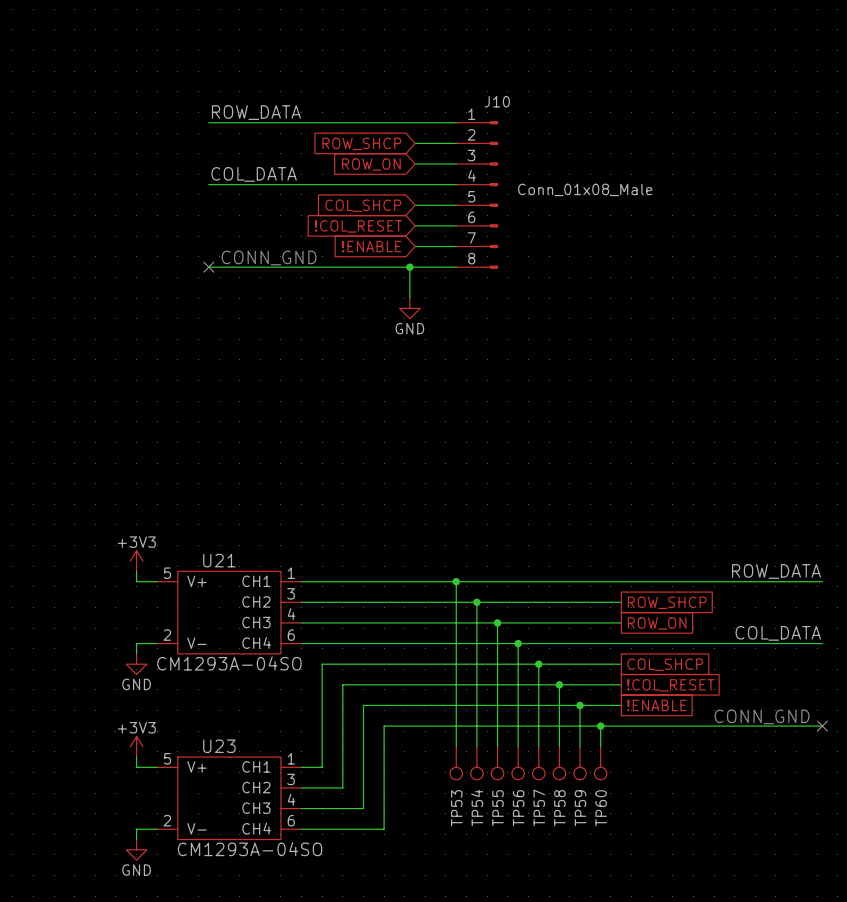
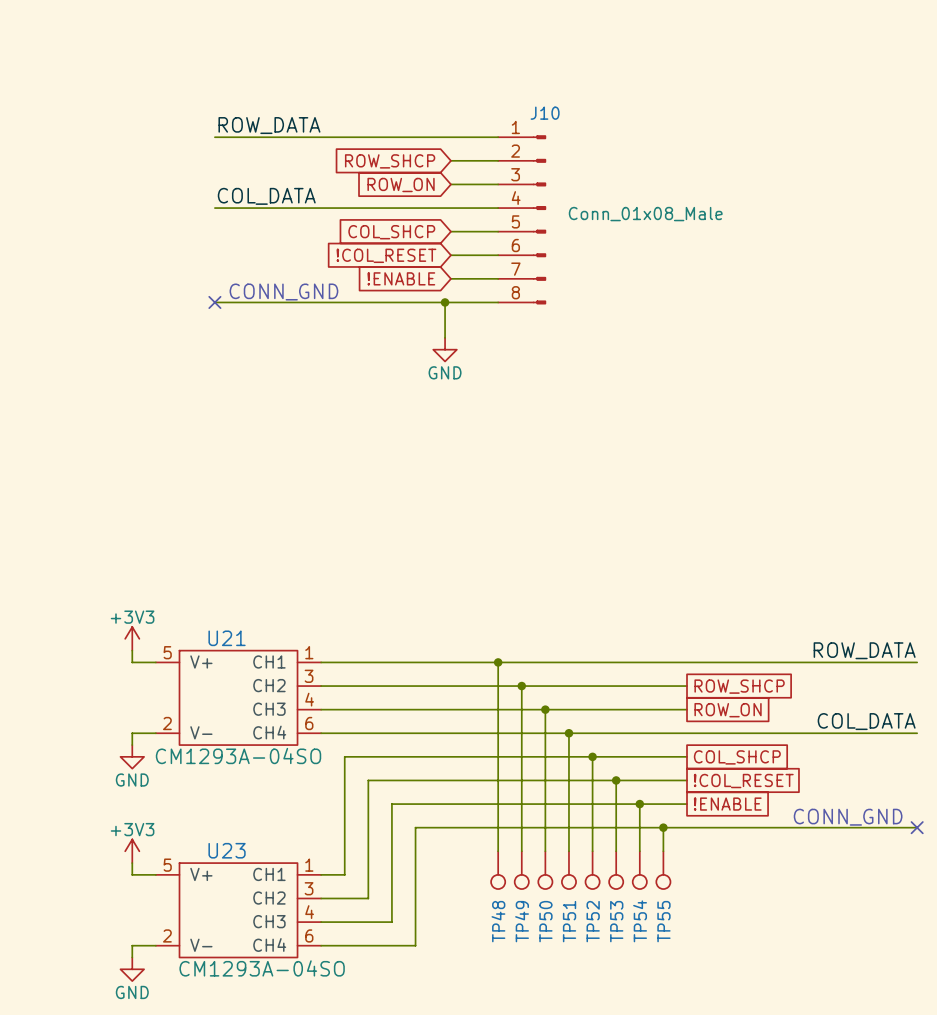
TP54 name: TP54 (477, 807) -> TP49 (522, 921)
TP57 name: TP57 (539, 807) -> TP52 (593, 921)
TP53 name: TP53 (456, 808) -> TP48 (498, 921)
TP55 name: TP55 (498, 808) -> TP50 (545, 921)
TP56 name: TP56 (518, 808) -> TP51 (569, 921)
TP58 name: TP58 (559, 808) -> TP53 (616, 921)
TP59 name: TP59 (580, 808) -> TP54 (640, 921)
TP60 name: TP60 (601, 808) -> TP55 (663, 921)

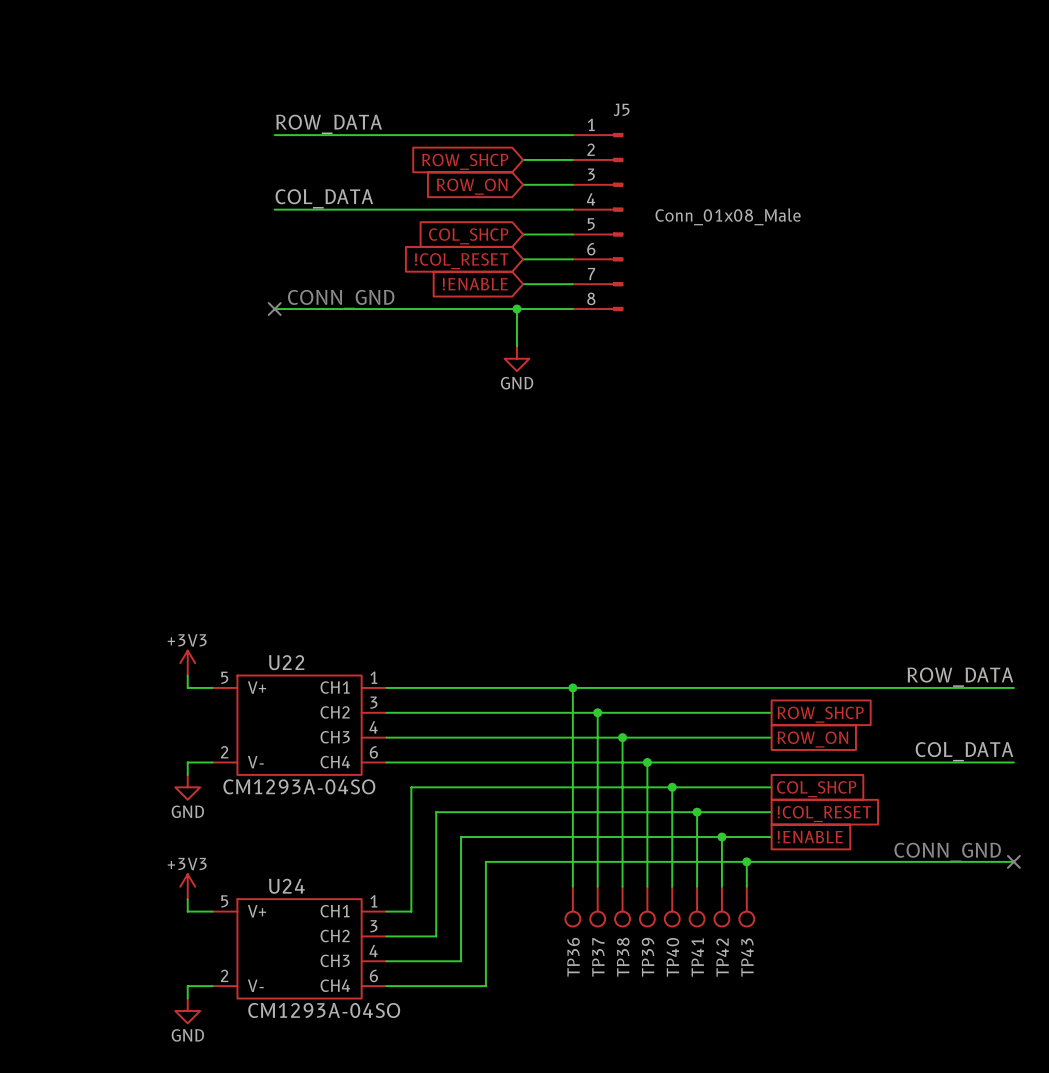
J10 name: J10 (545, 113) -> J5 (621, 109)
U21 name: U21 (227, 638) -> U22 (286, 662)
U23 name: U23 (227, 850) -> U24 (286, 886)
TP48 name: TP48 (498, 921) -> TP36 (573, 957)
TP49 name: TP49 (522, 921) -> TP37 (598, 957)
TP50 name: TP50 (545, 921) -> TP38 (623, 957)
TP51 name: TP51 (569, 921) -> TP39 (648, 957)
TP52 name: TP52 (593, 921) -> TP40 (672, 957)
TP53 name: TP53 (616, 921) -> TP41 (697, 957)
TP54 name: TP54 (640, 921) -> TP42 (722, 957)
TP55 name: TP55 (663, 921) -> TP43 (747, 957)

